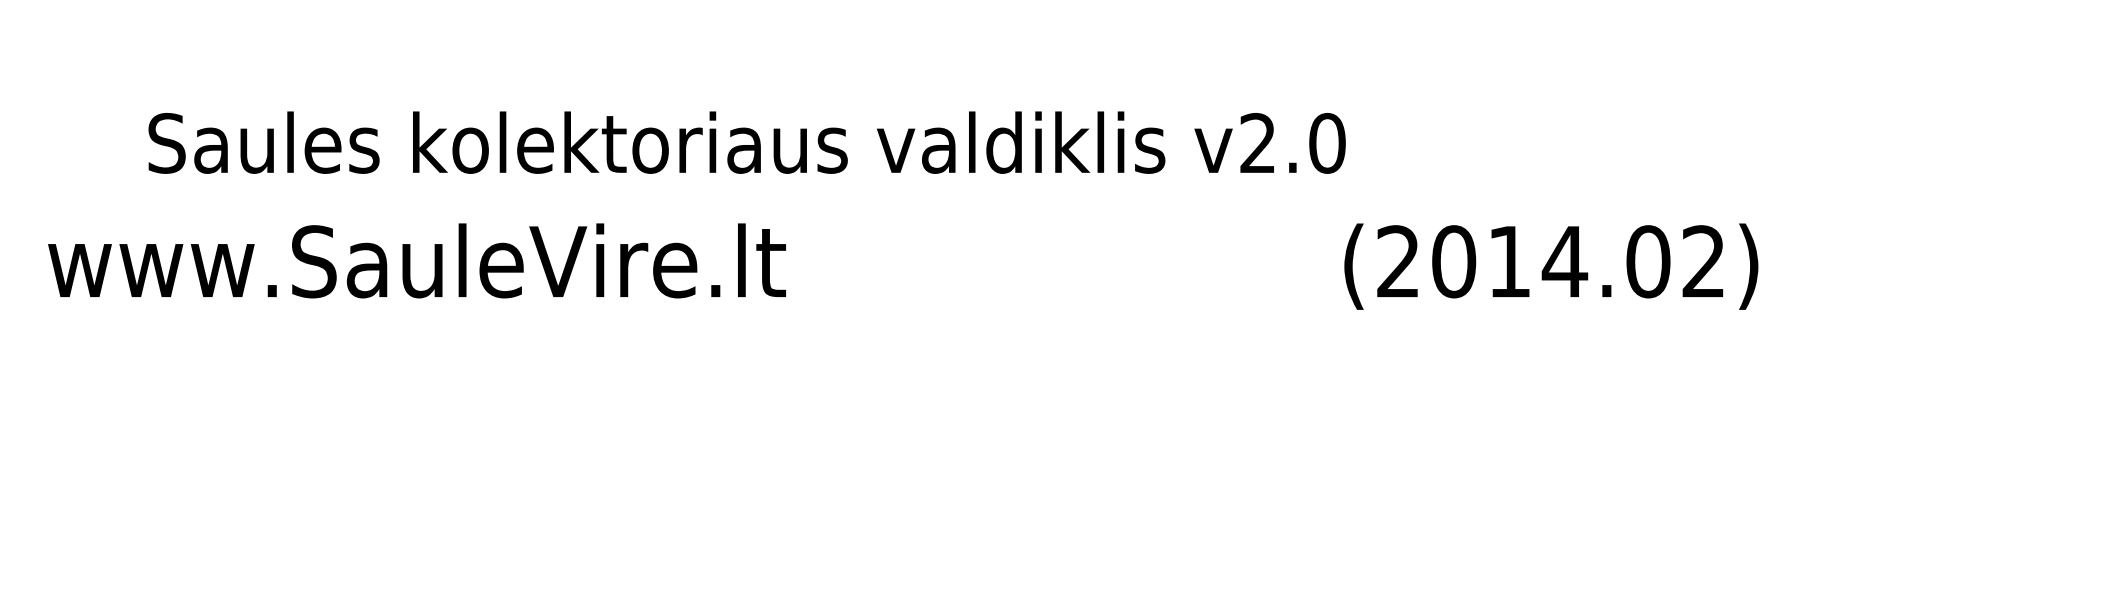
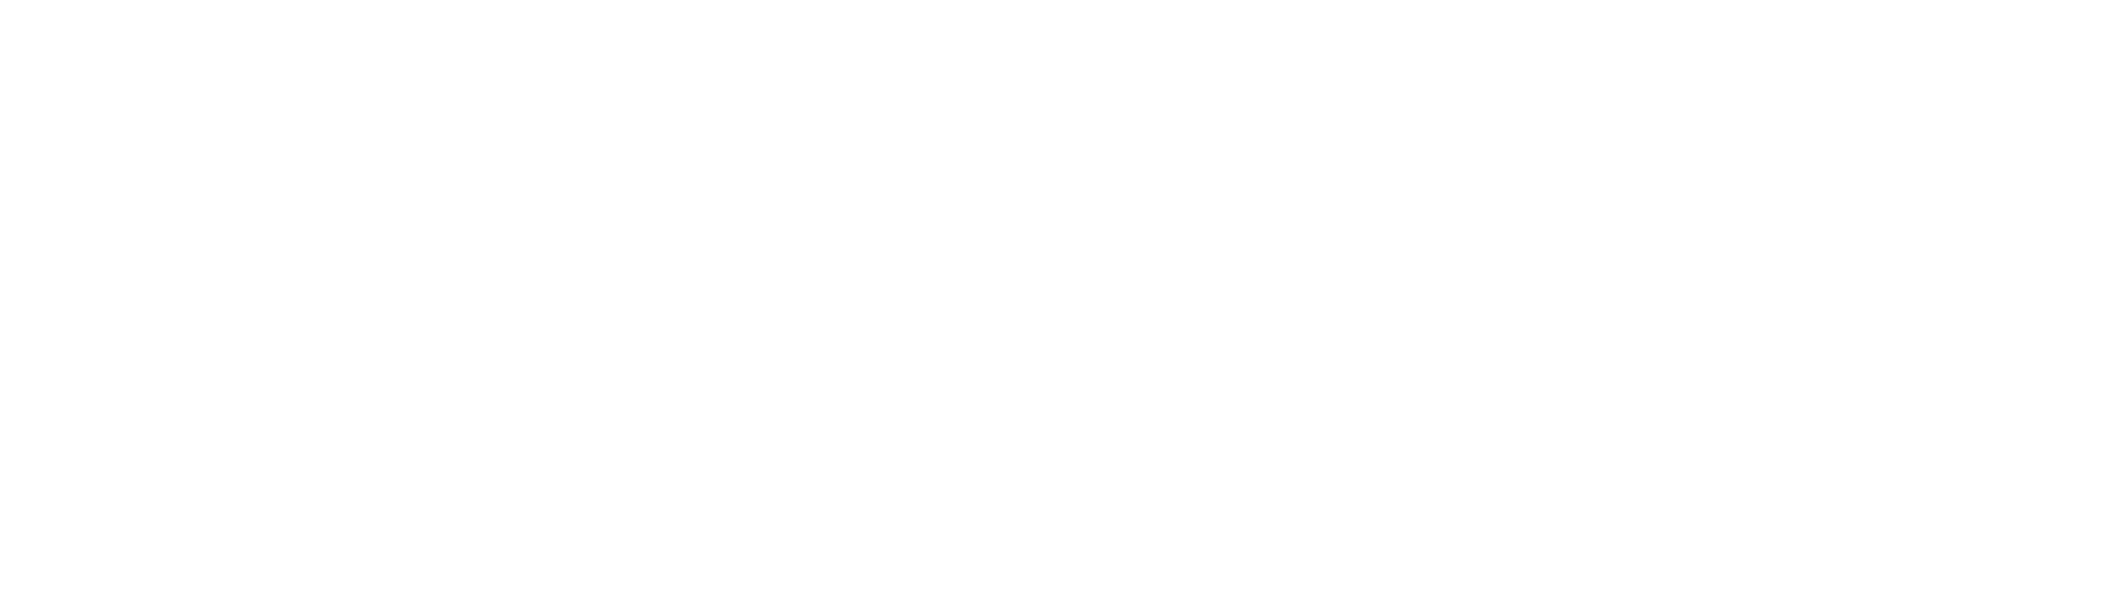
text: Saules kolektoriaus valdiklis v2.0 (747, 142) -> none
text: www.SauleVire.lt (417, 260) -> none
text: (2014.02) (1551, 266) -> none

